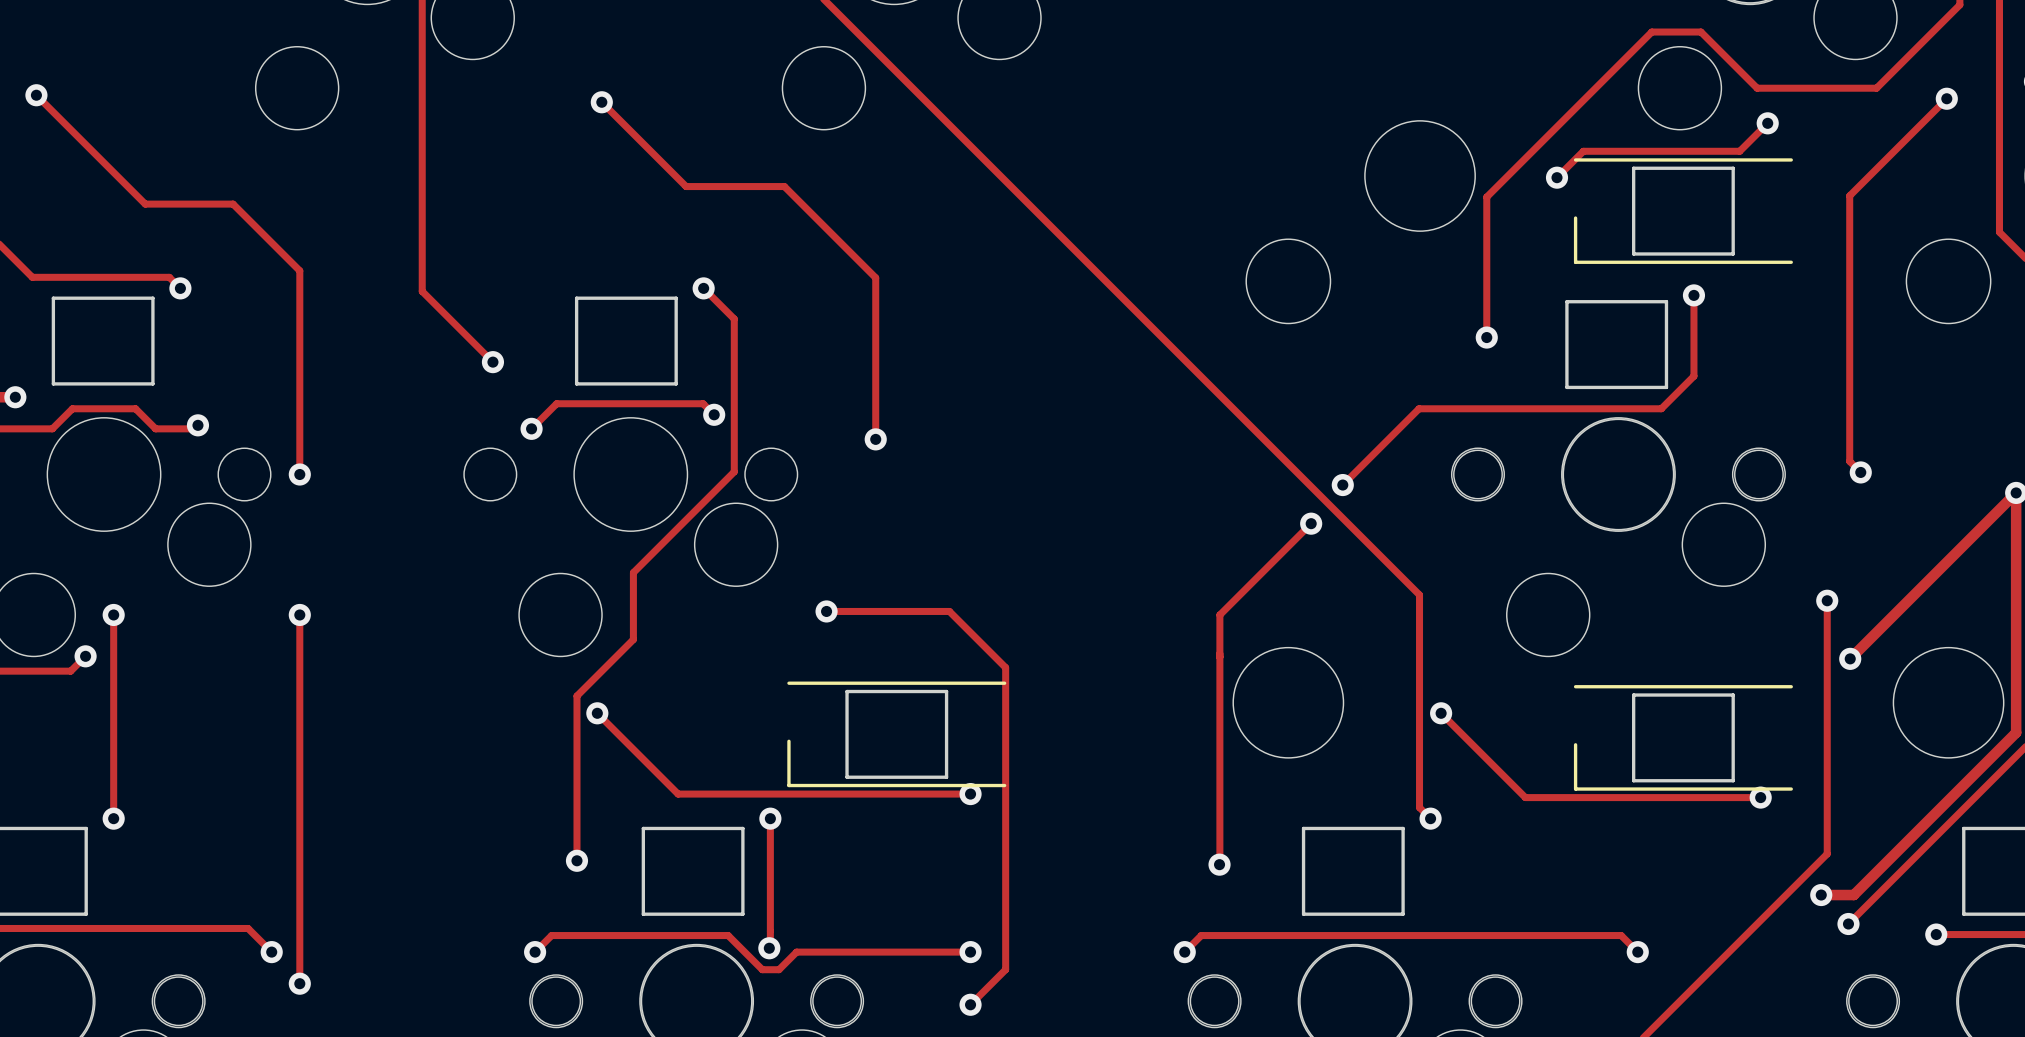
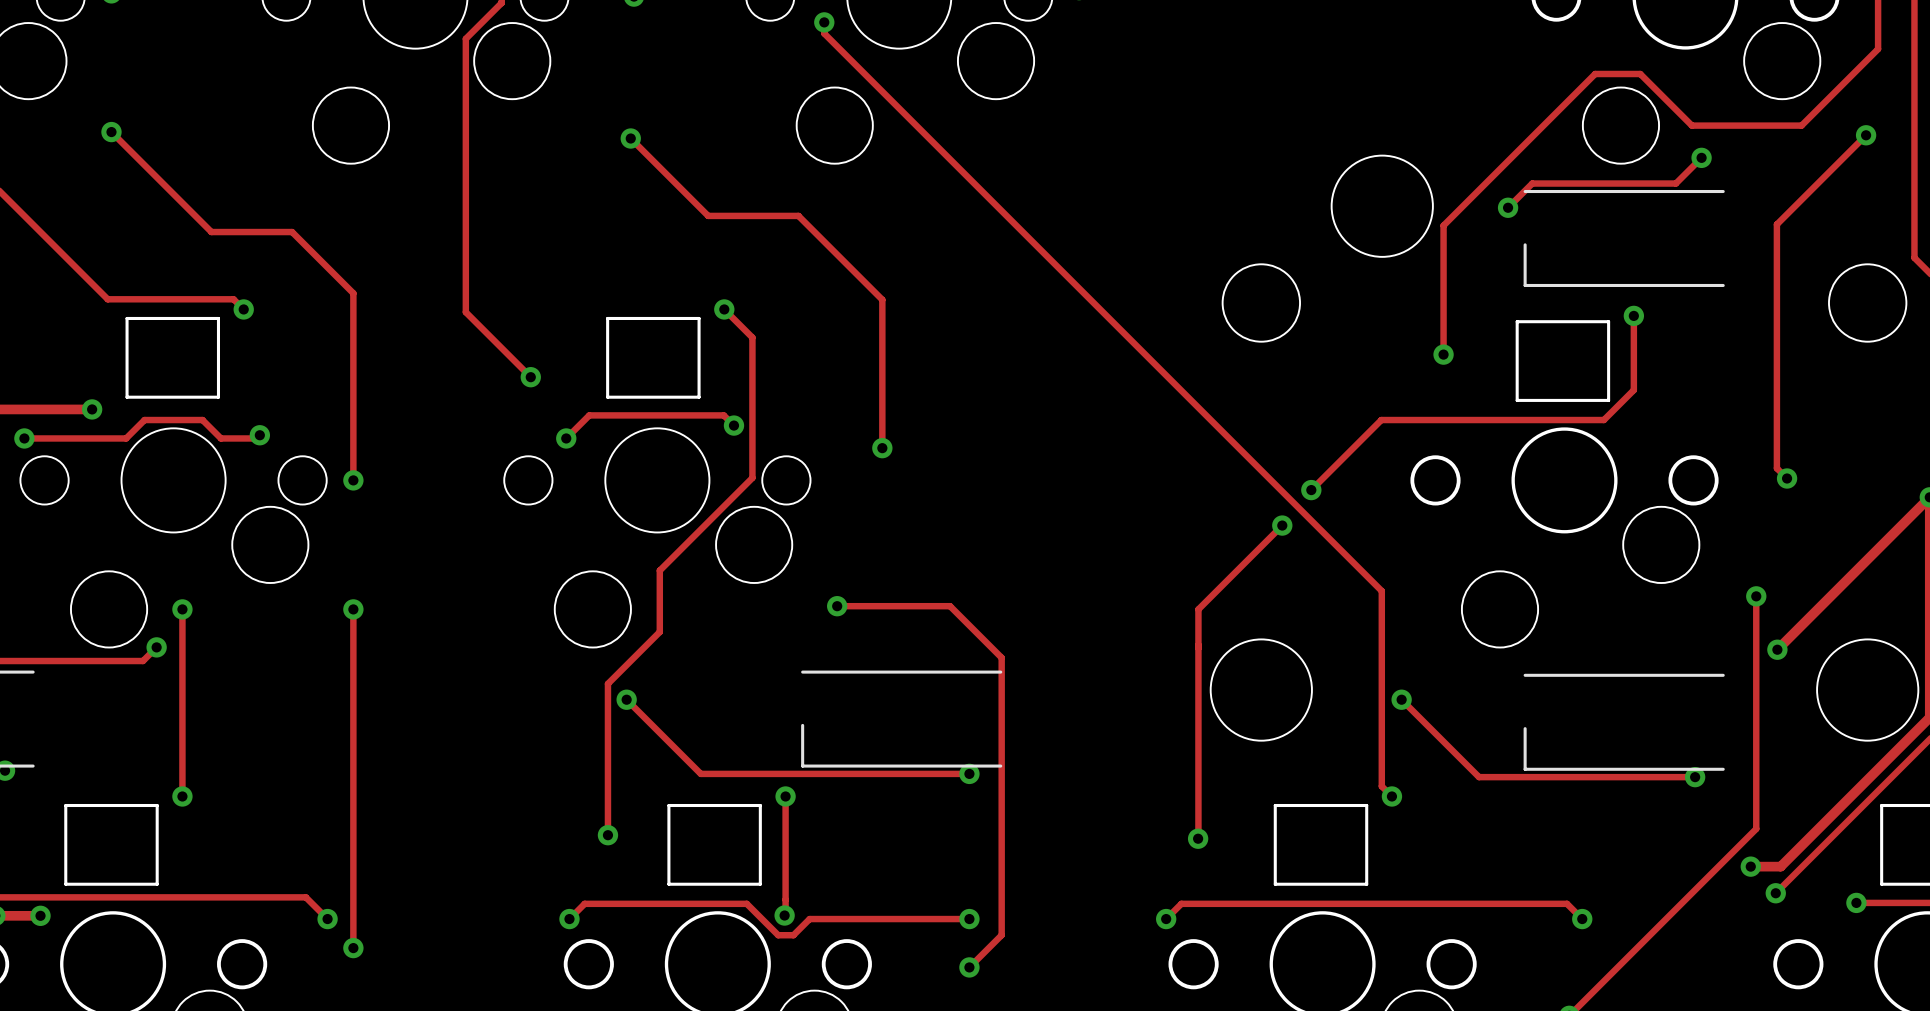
part footprint: [1573, 158, 1793, 264] -> [1523, 189, 1725, 288]
part footprint: [787, 681, 1007, 788] -> [801, 670, 1003, 768]
part footprint: [1573, 685, 1793, 791] -> [1523, 673, 1725, 771]

